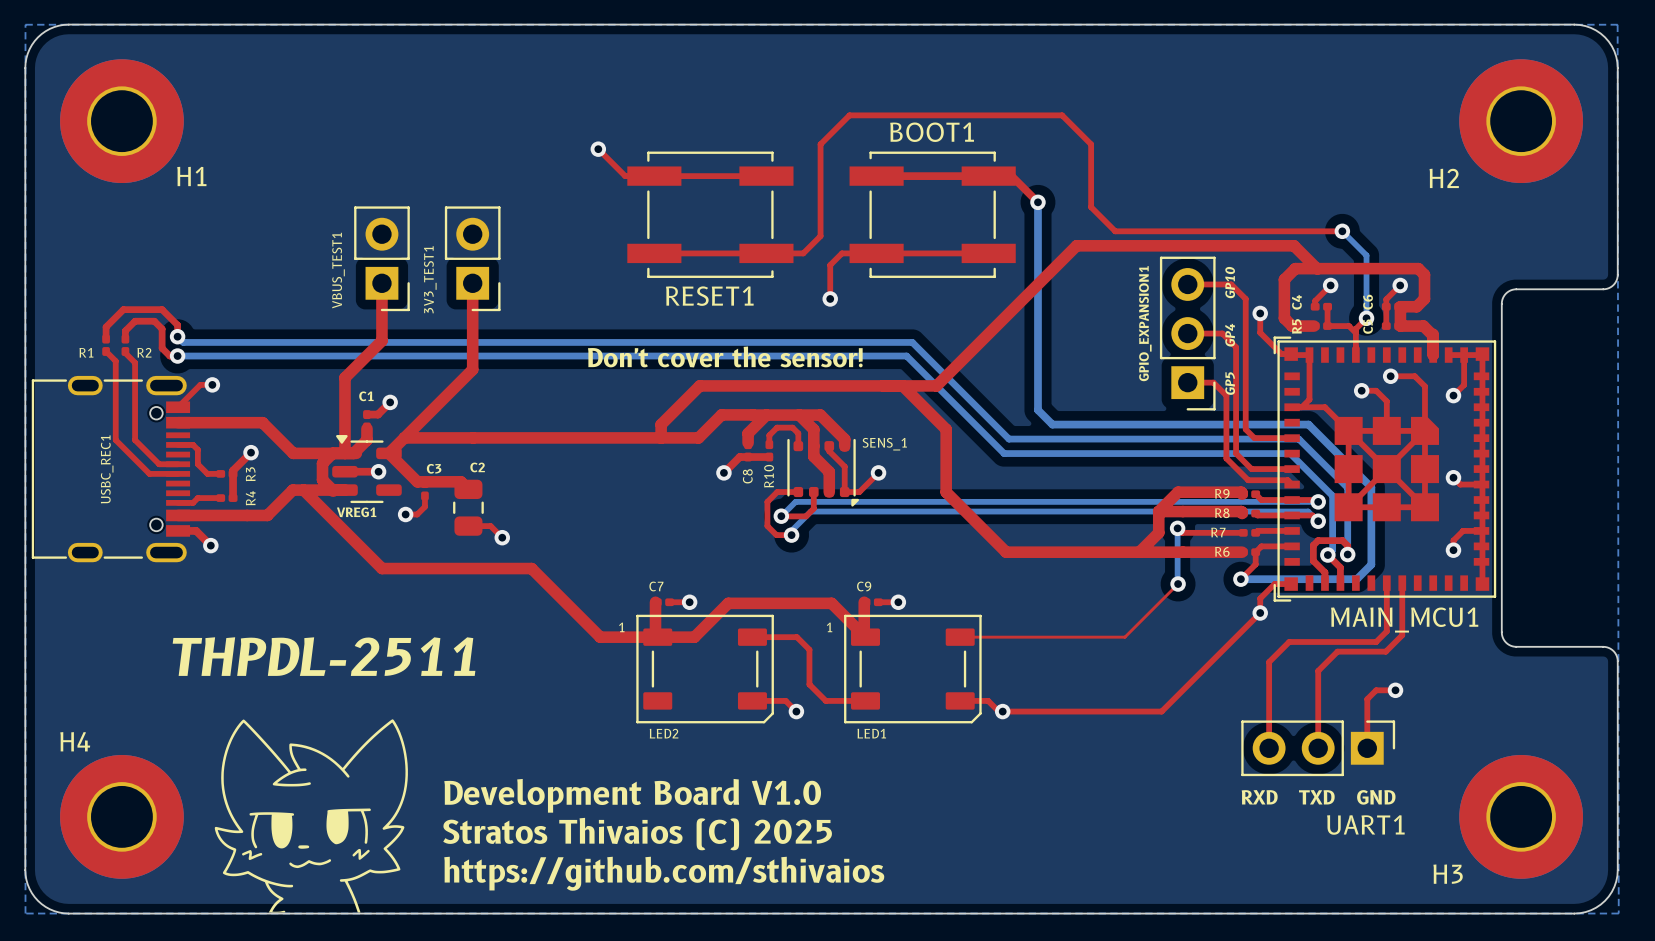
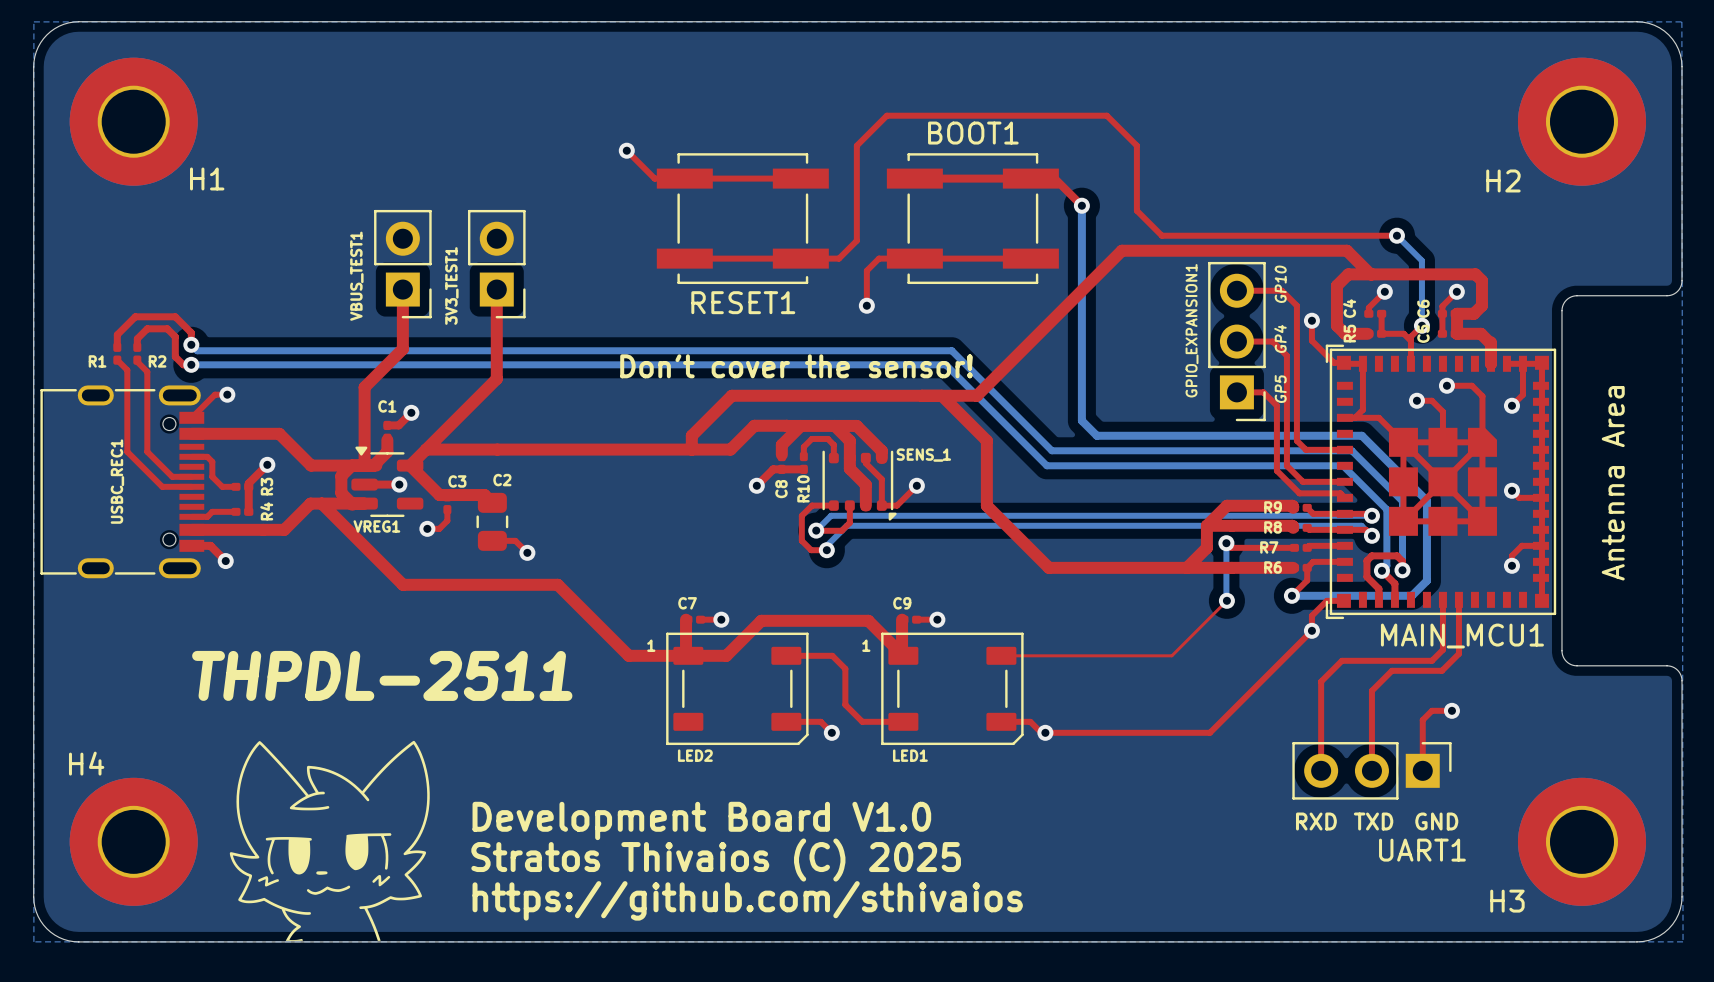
MAIN_MCU1 text: none -> Antenna Area (1613, 483)

